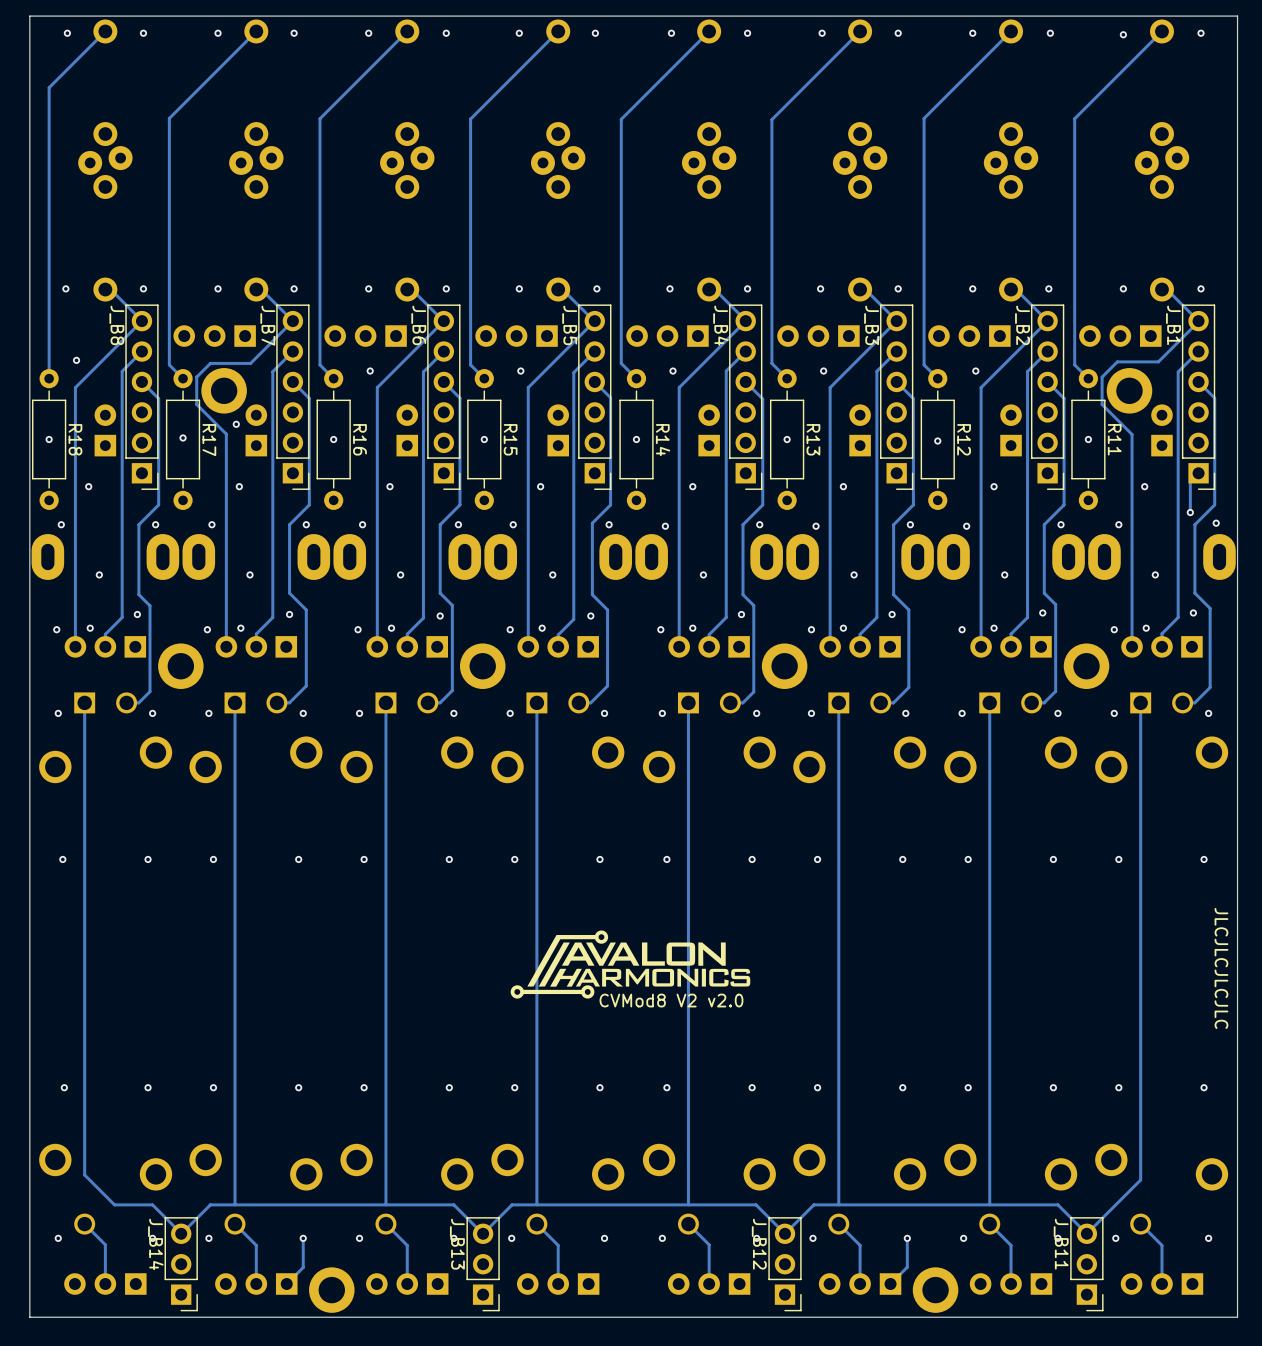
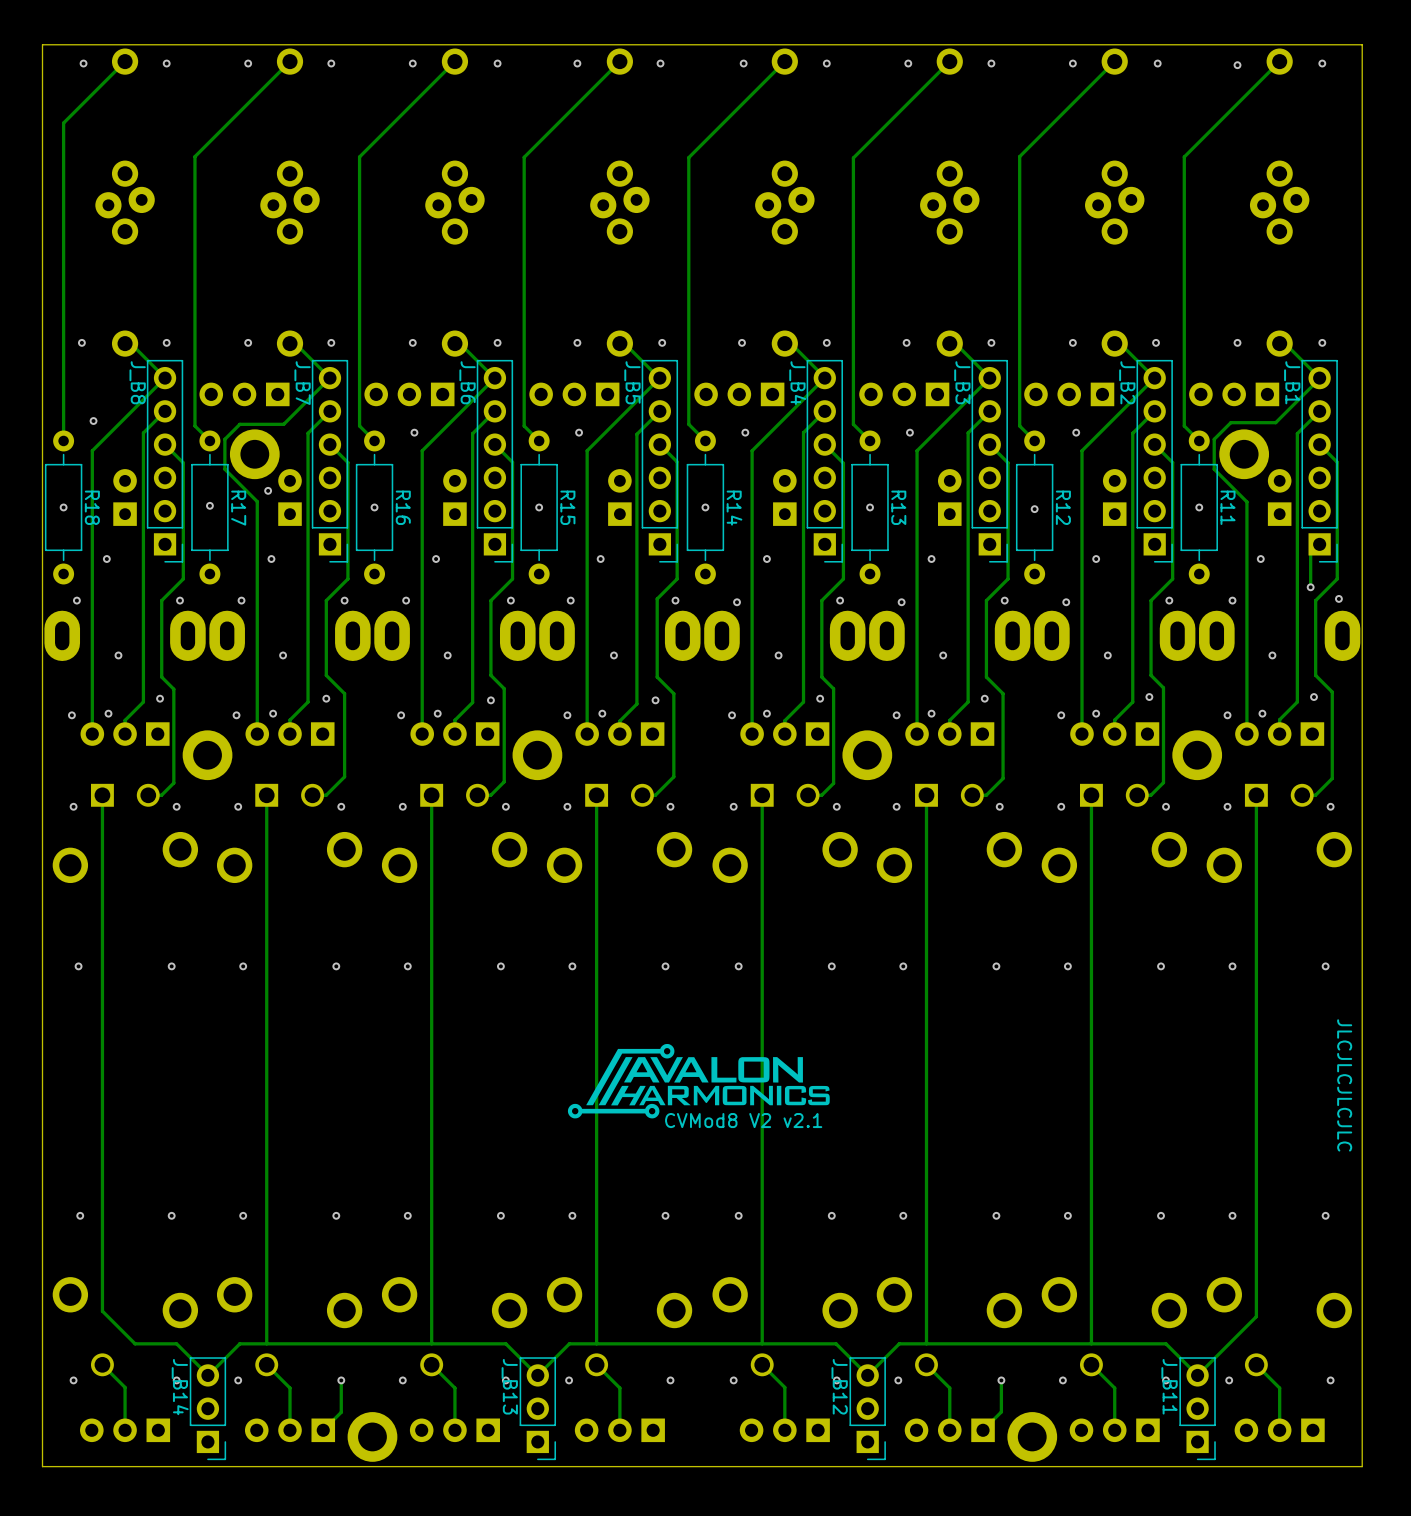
text: CVMod8 V2 v2.0 (671, 1000) -> CVMod8 V2 v2.1 (743, 1120)

